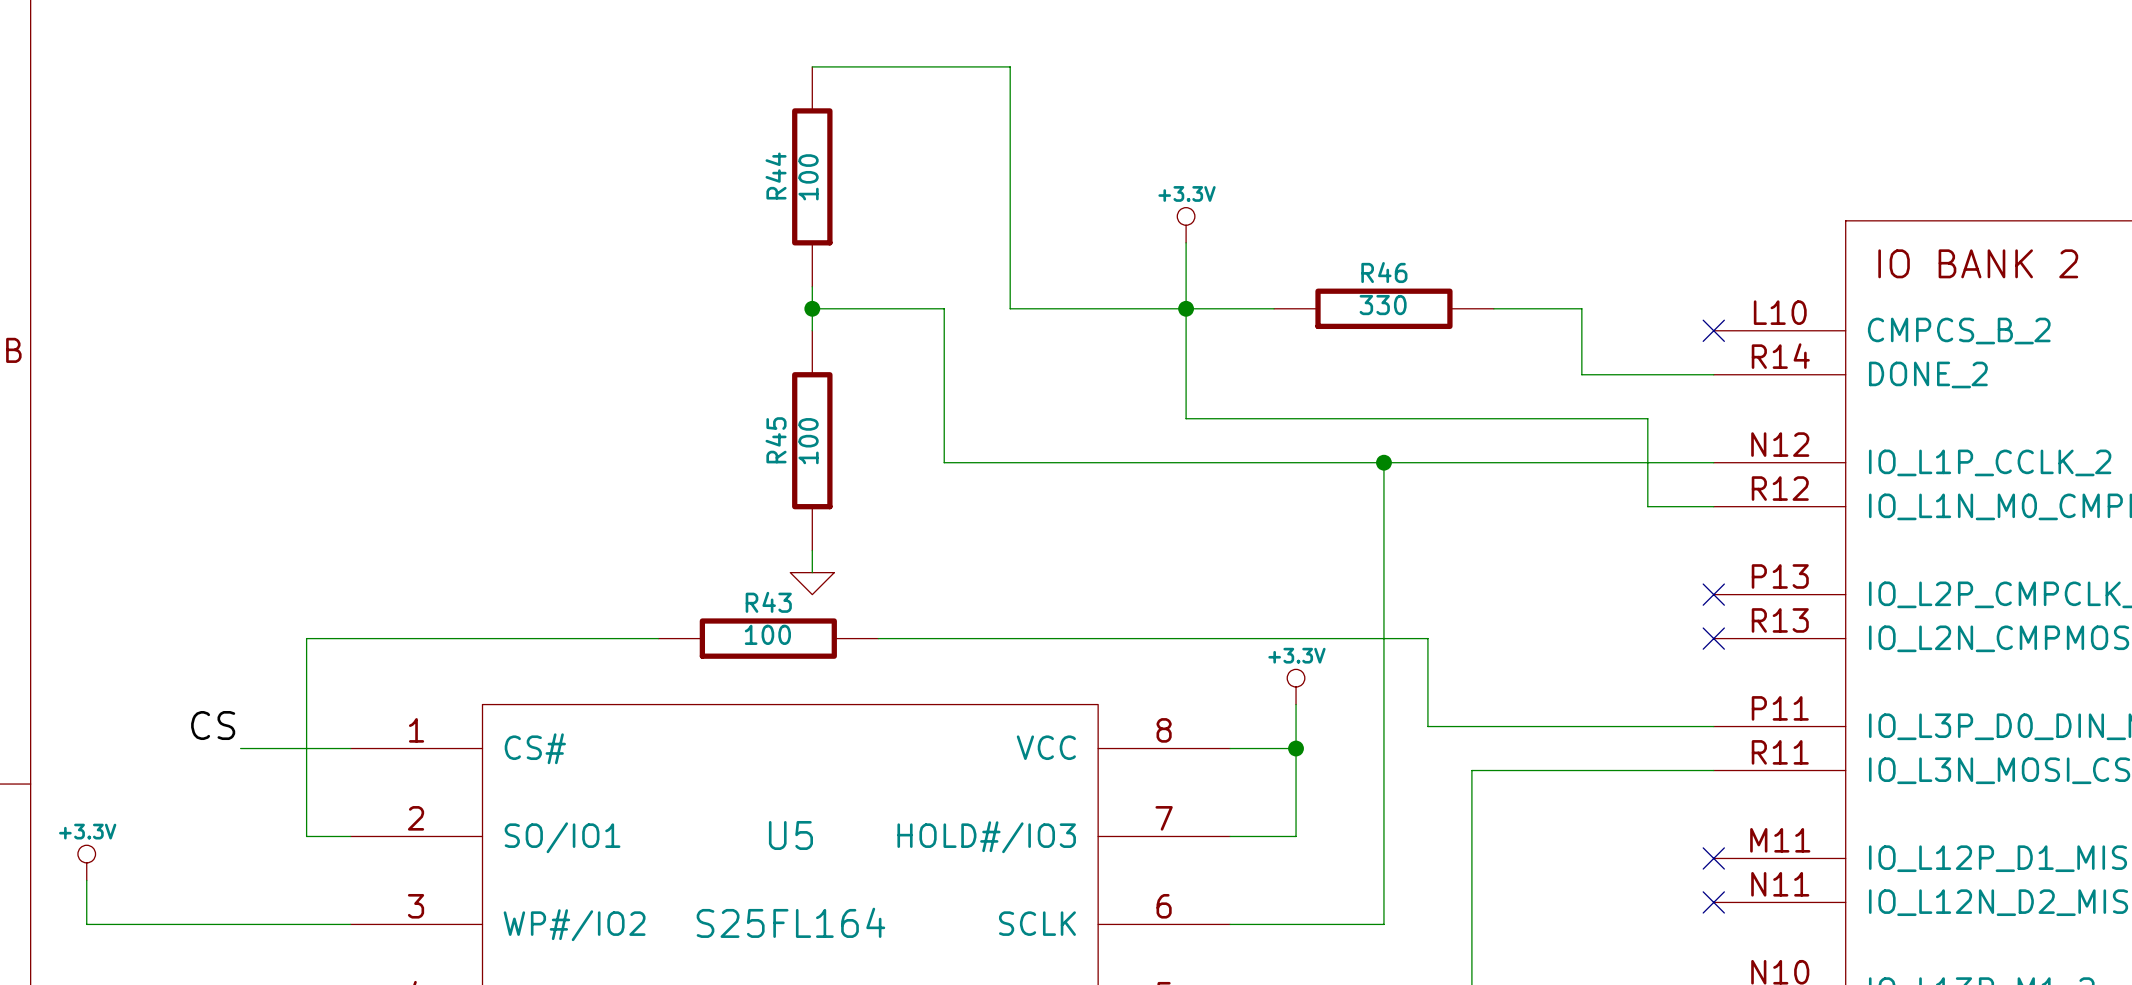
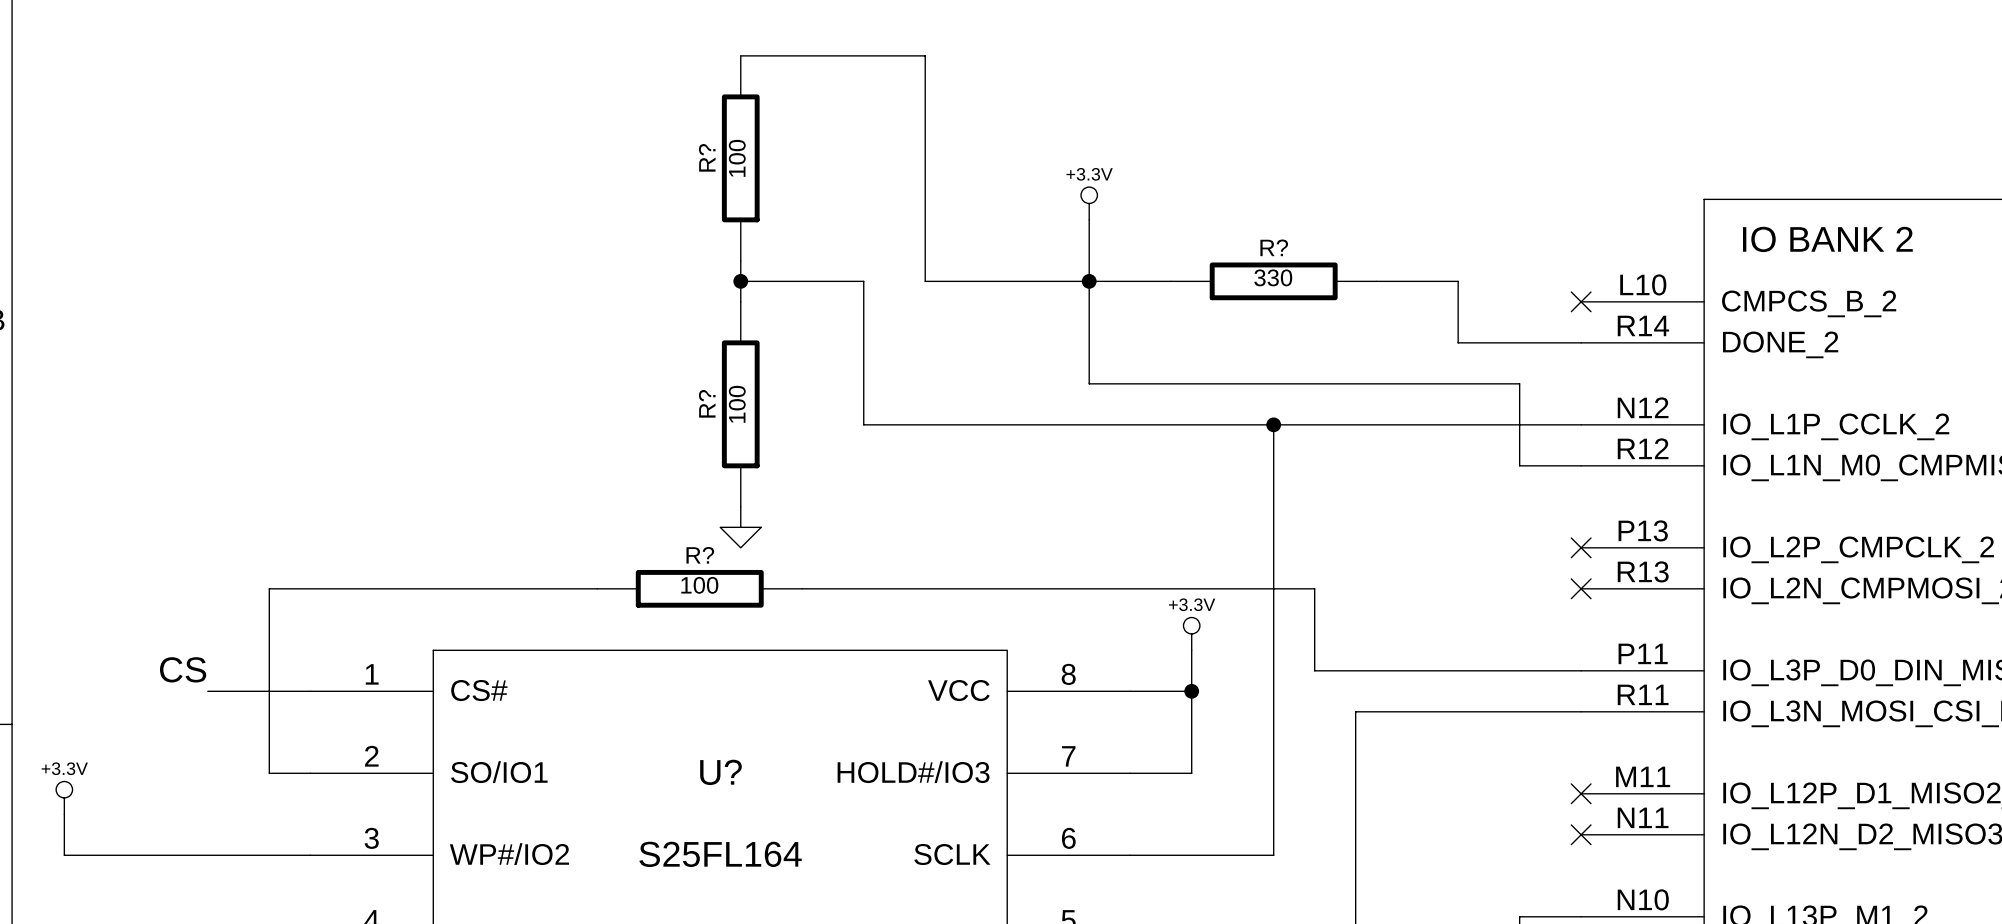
R44 name: R44 (776, 176) -> R? (707, 157)
R46 name: R46 (1384, 272) -> R? (1274, 247)
R45 name: R45 (776, 440) -> R? (707, 403)
R43 name: R43 (768, 602) -> R? (700, 555)
U5 name: U5 (790, 835) -> U? (720, 772)

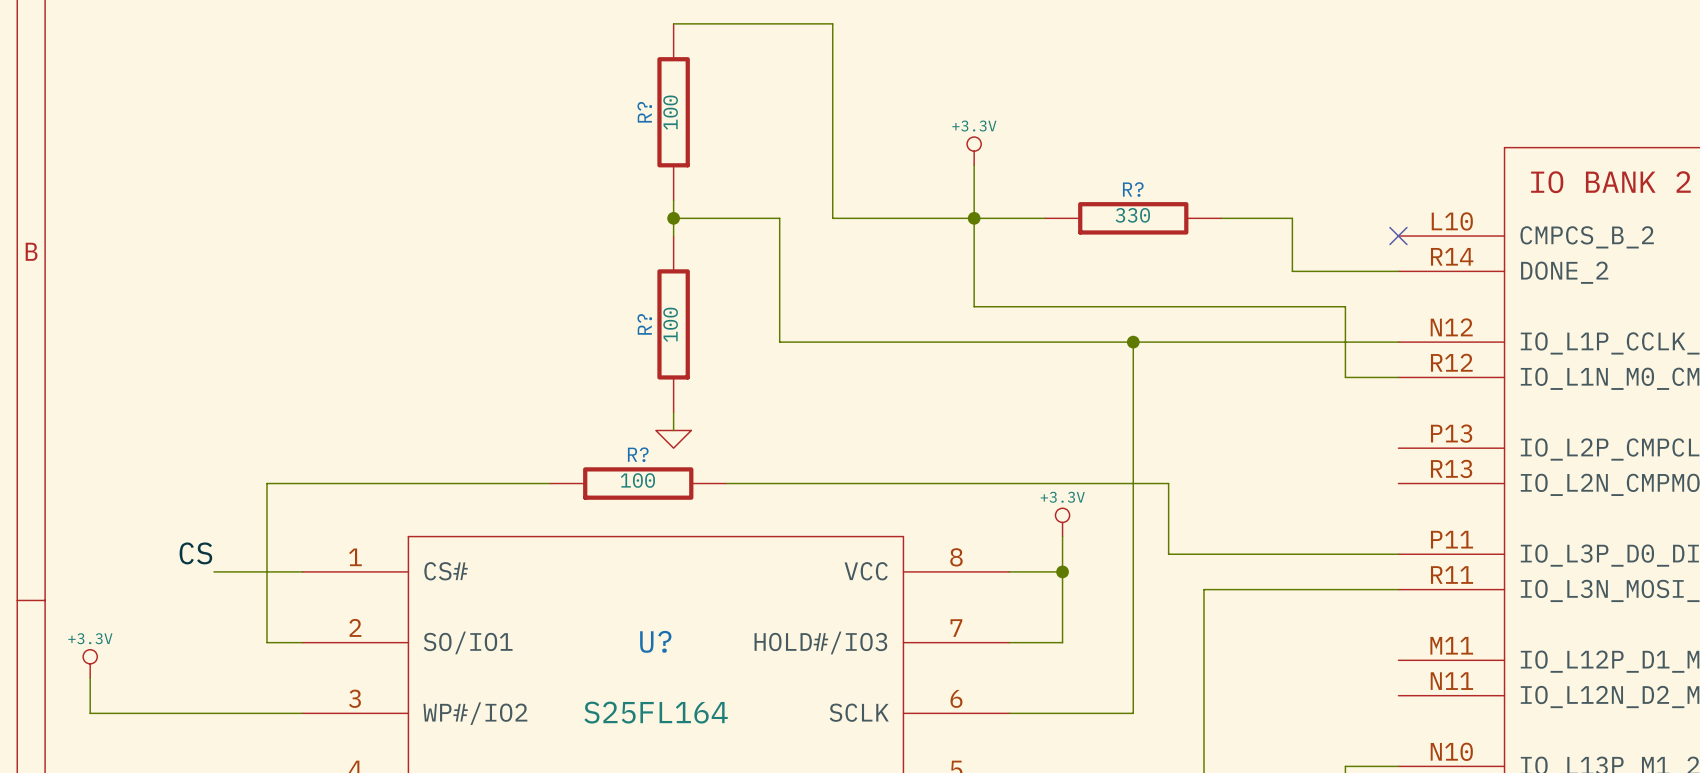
no-connect mark: (1581, 547) -> none
no-connect mark: (1581, 588) -> none
no-connect mark: (1581, 793) -> none
no-connect mark: (1581, 834) -> none

